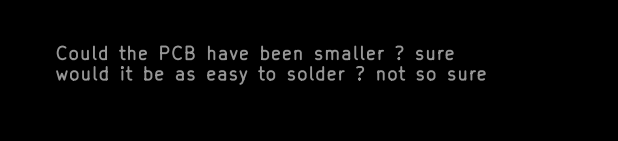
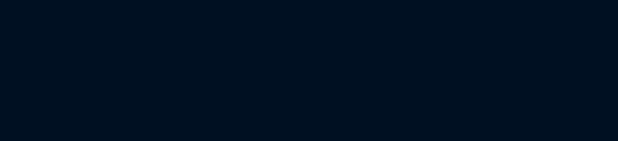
text: Could the PCB have been smaller ? sure (255, 52) -> none
text: would it be as easy to solder ? not so sure (270, 75) -> none

